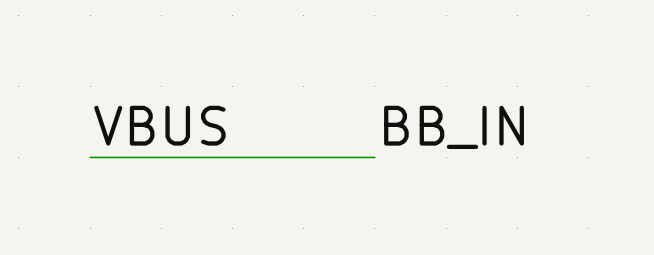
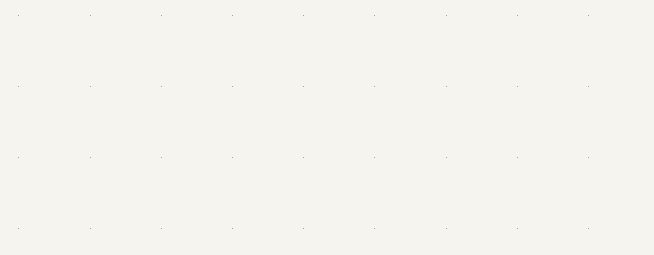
label: VBUS (159, 125) -> none
label: BB_IN (454, 127) -> none
wire: (90, 157) (374, 157) -> none

